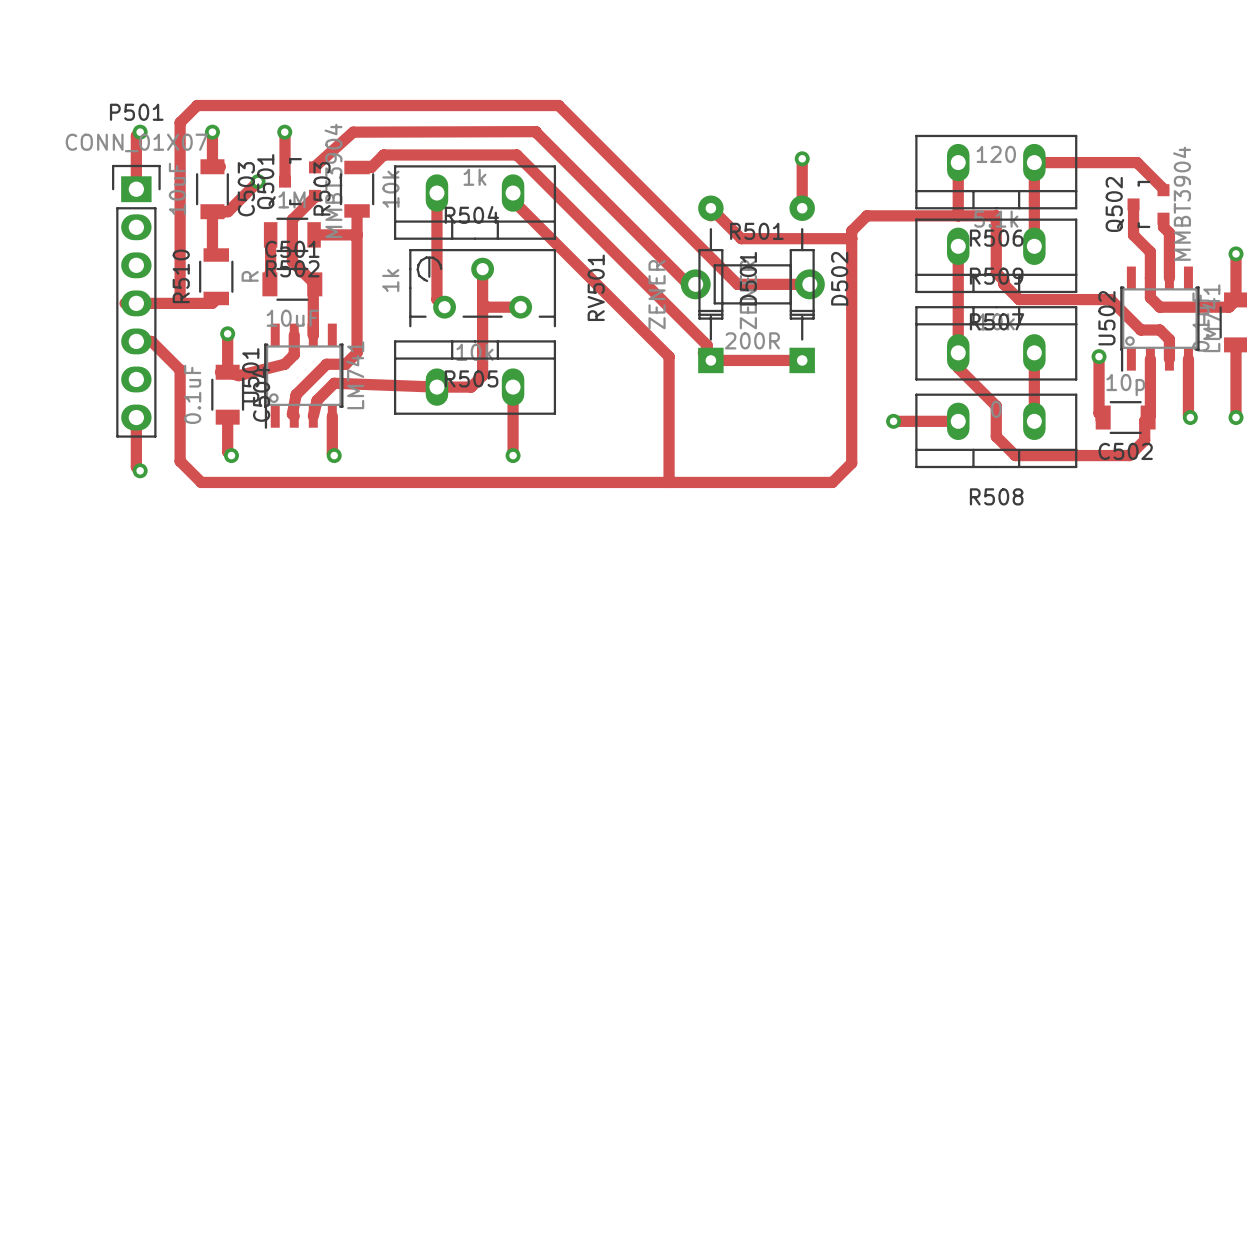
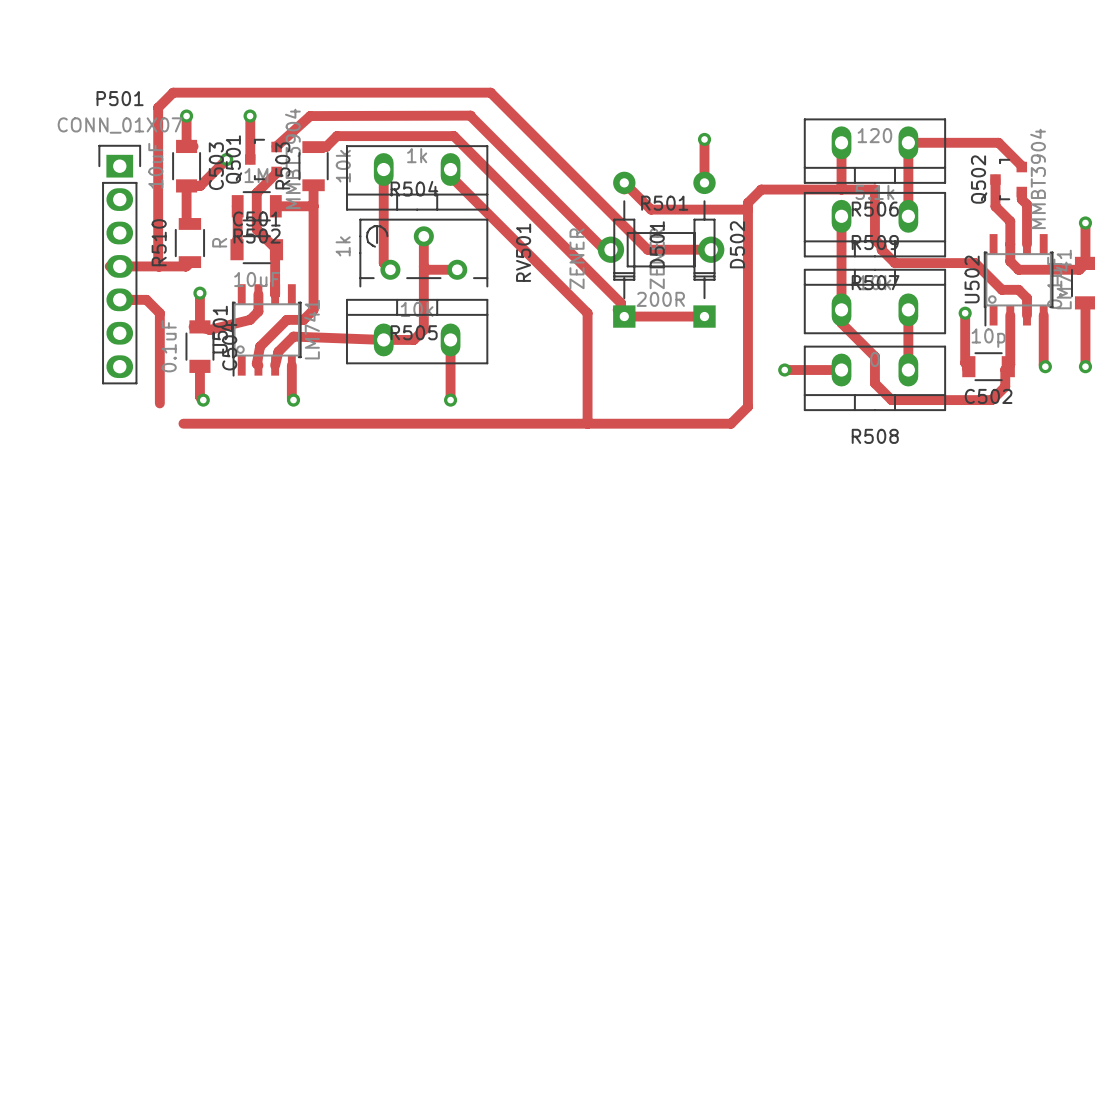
track: (140, 132) (136, 135) (136, 189) -> none
via: (140, 132) -> none
track: (151, 341) (180, 369) (180, 461) (201, 482) (208, 482) -> (133, 299) (146, 299) (159, 313) (159, 403)
track: (136, 417) (136, 466) (140, 470) -> none
via: (140, 470) -> none

